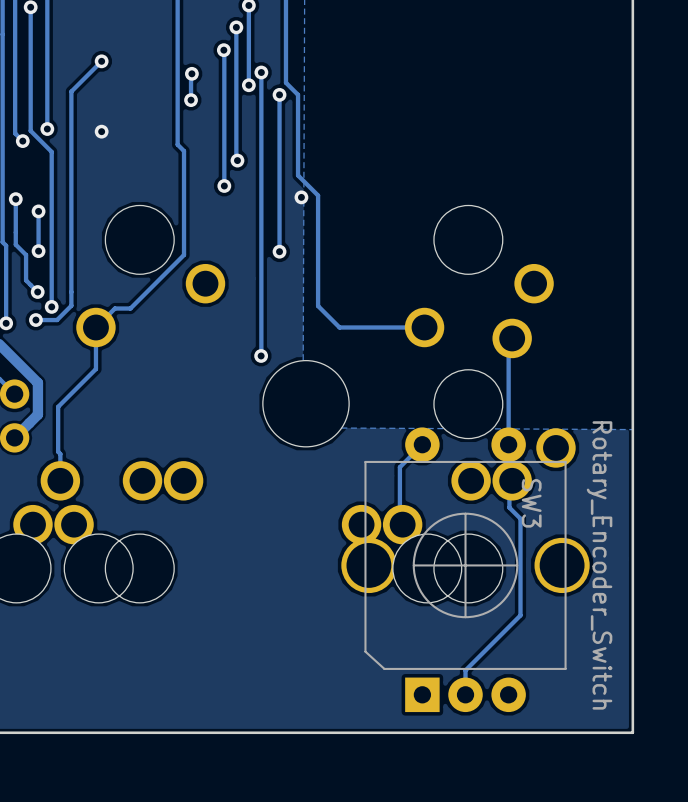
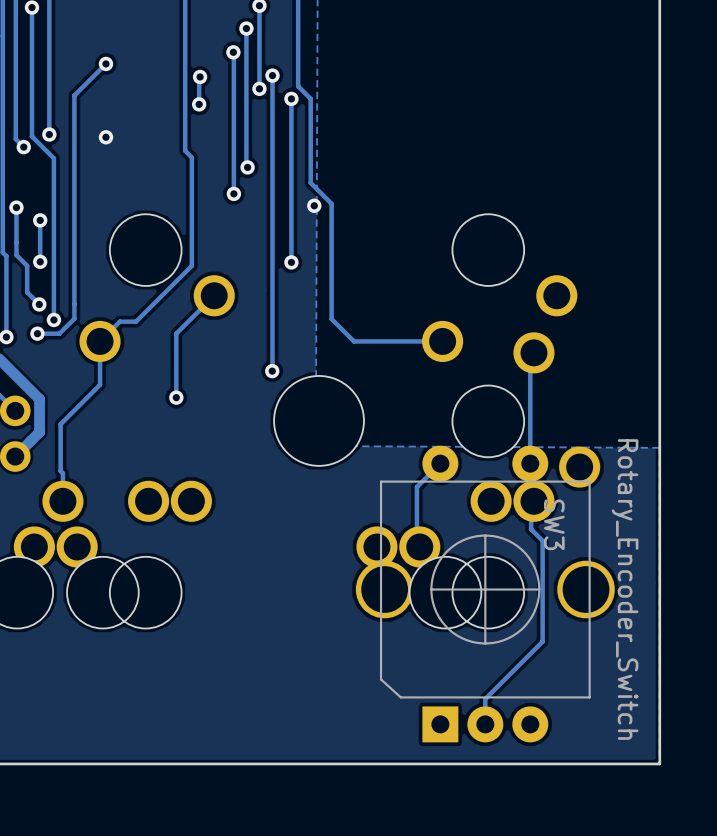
track: none -> (214, 295) (176, 333) (176, 397)
via: none -> (176, 397)

